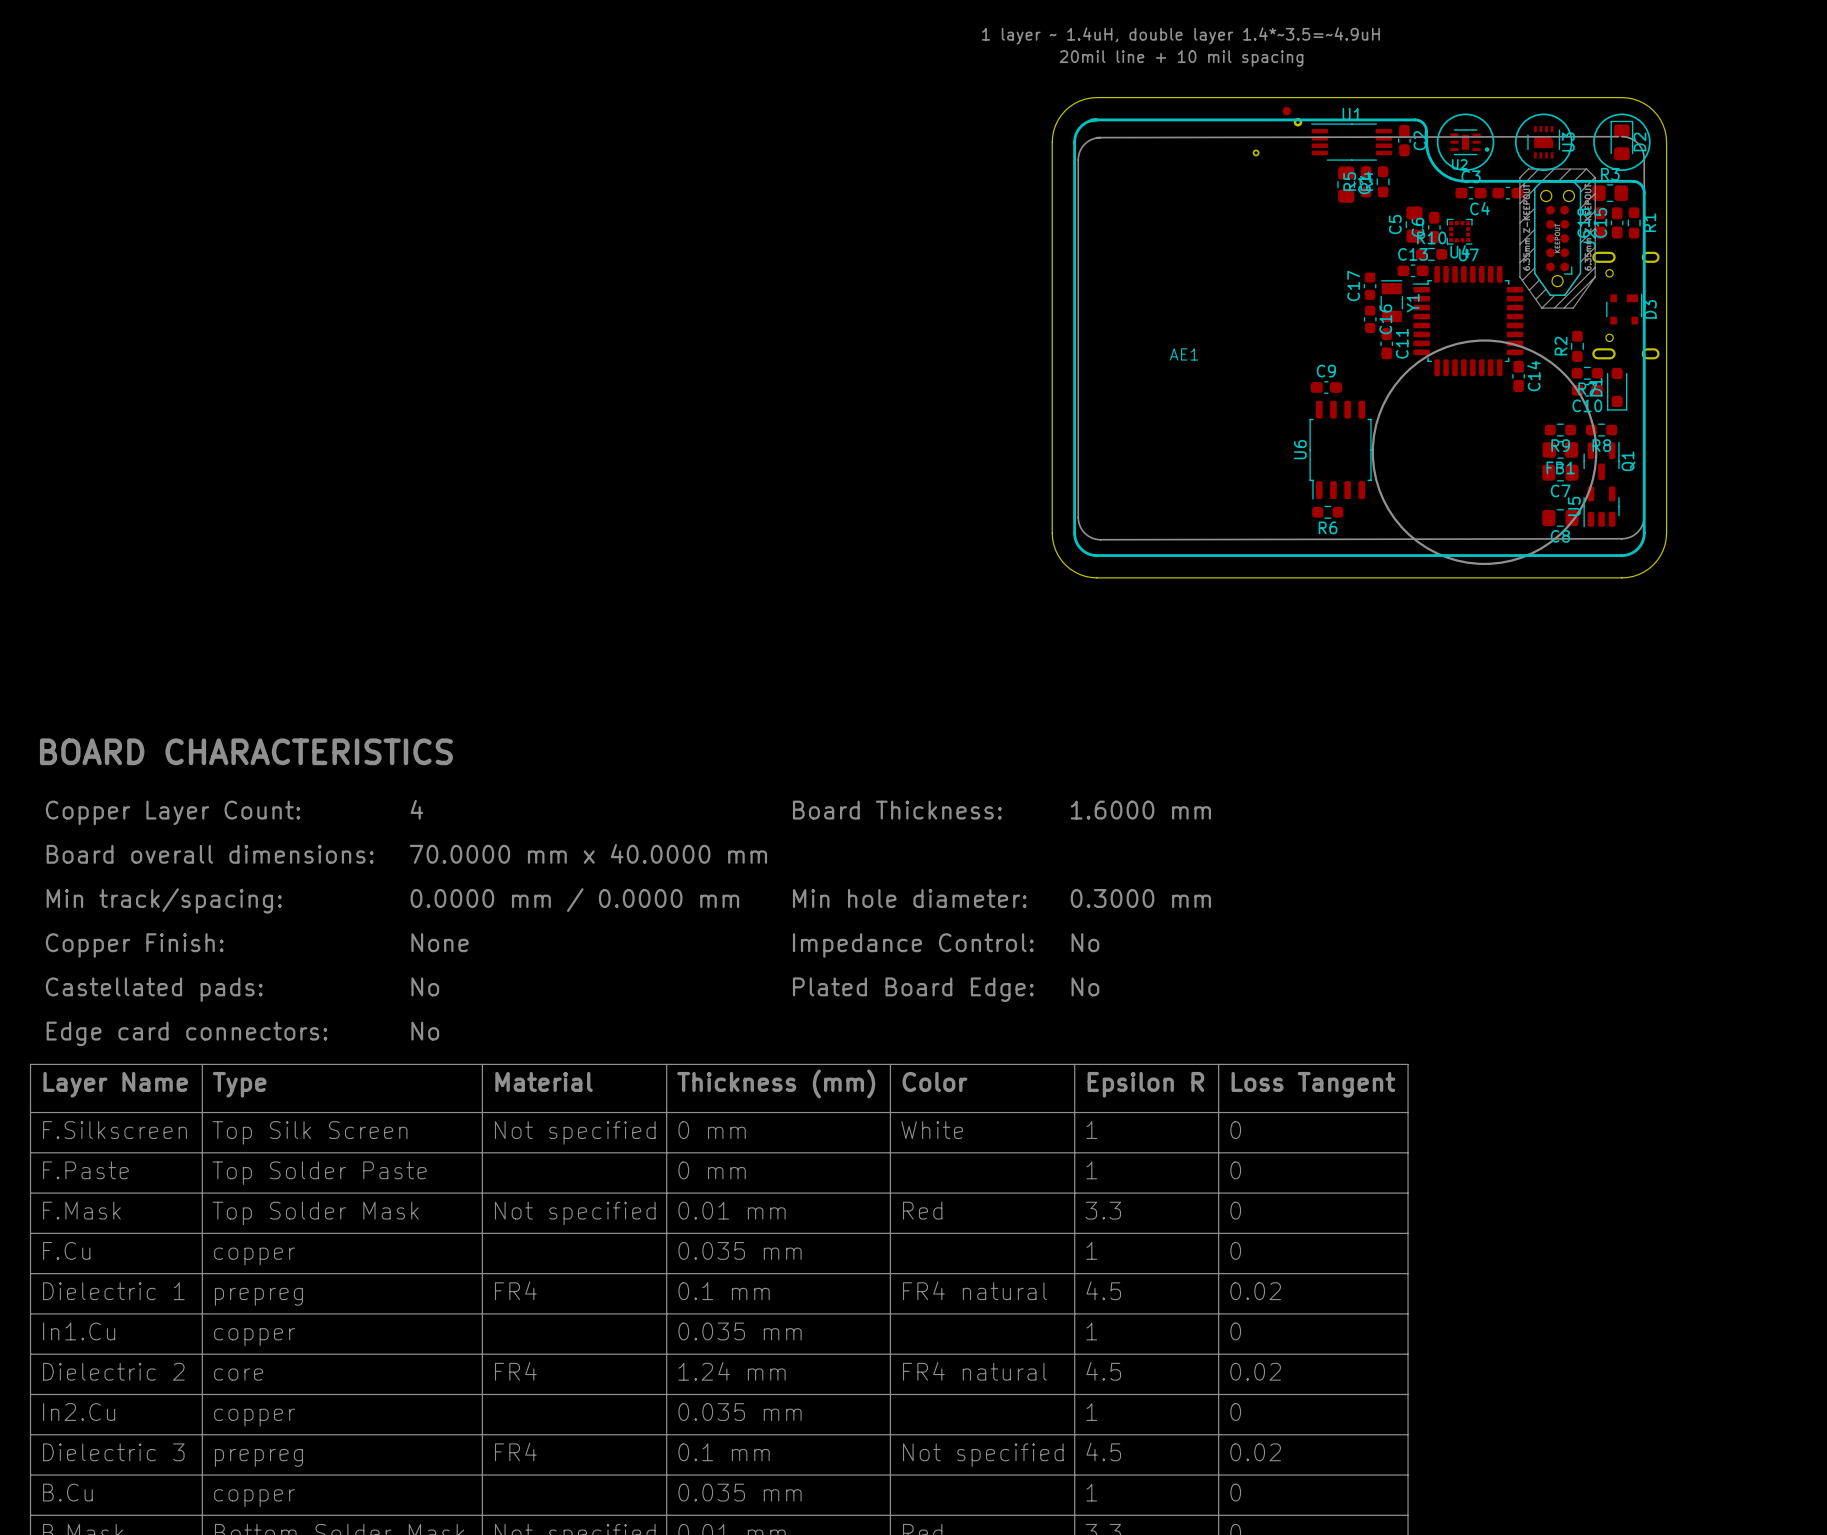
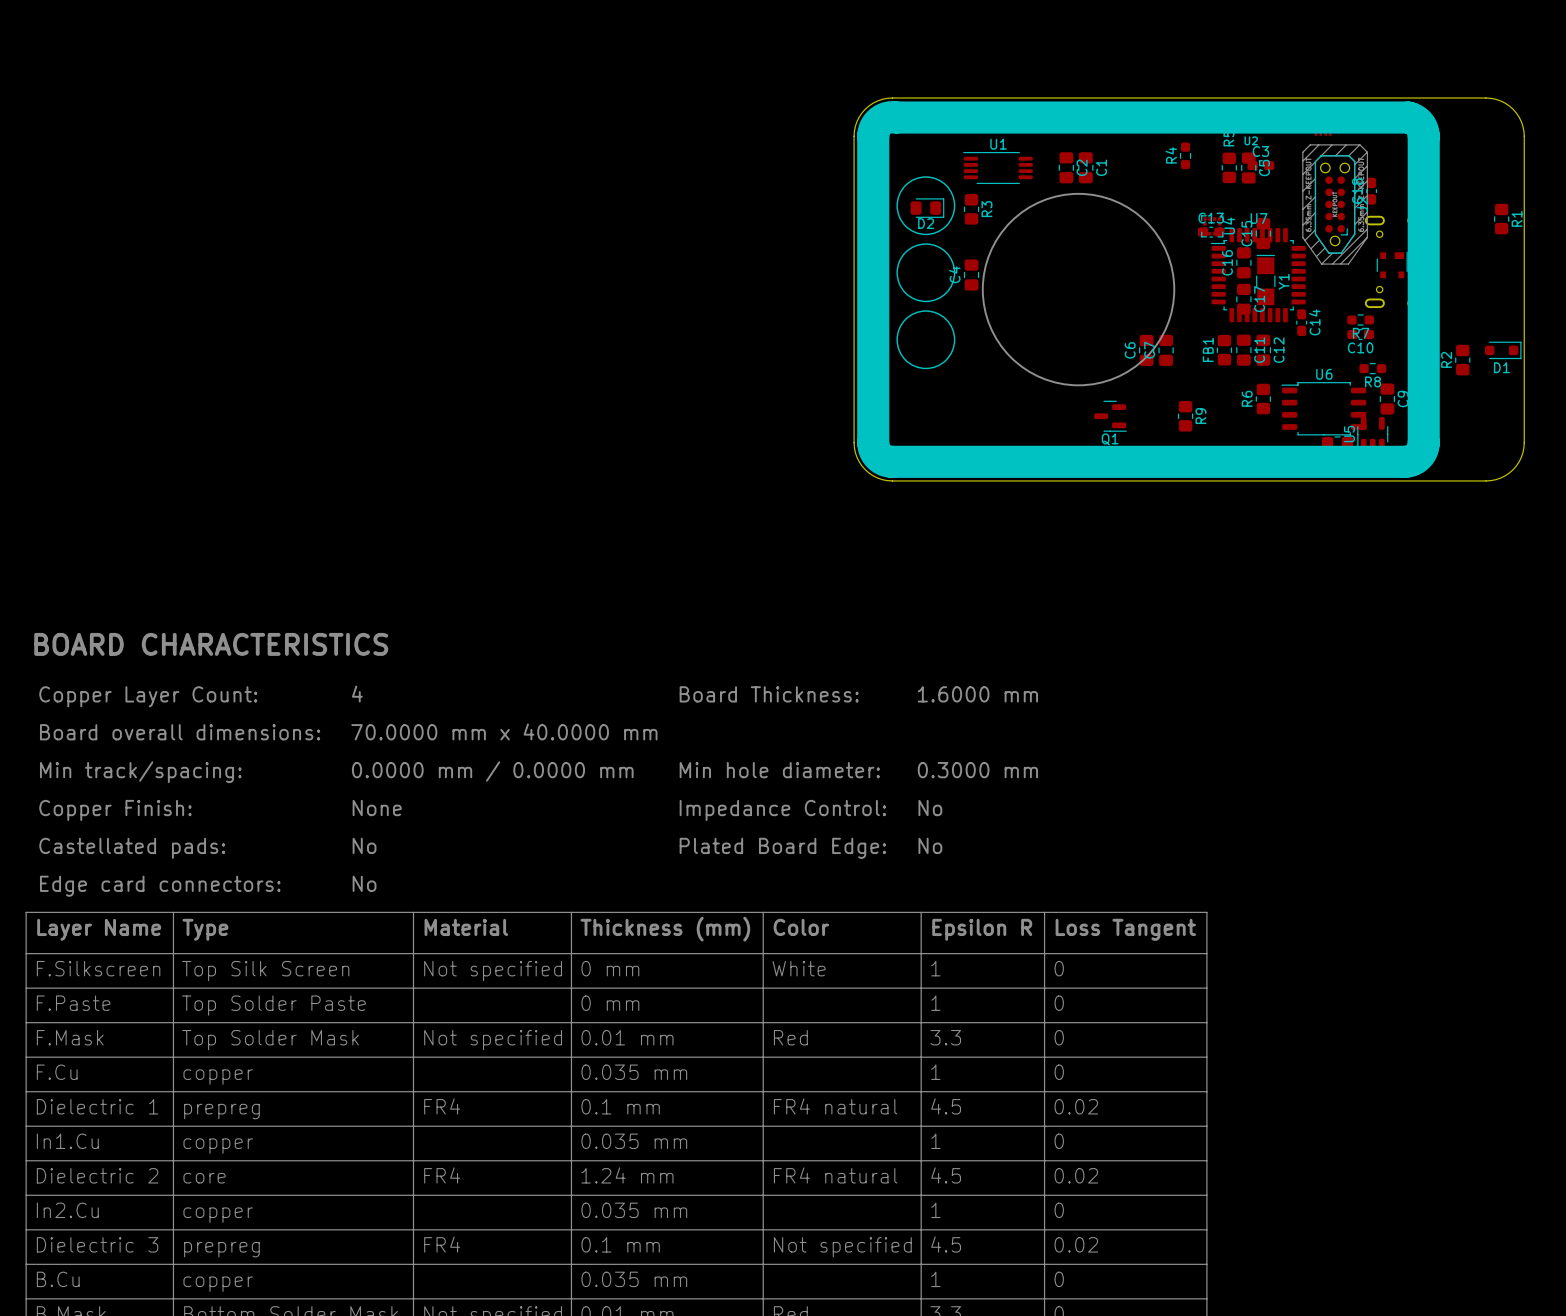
board edge: (1096, 97) (1621, 97) (1639, 100) (1649, 106) (1660, 119) (1665, 130) (1666, 142) (1666, 533) (1665, 544) (1657, 560) (1649, 568) (1639, 574) (1621, 577) (1096, 577) (1079, 574) (1069, 568) (1061, 560) (1055, 550) (1052, 533) (1052, 142) (1055, 125) (1065, 110) (1079, 100) (1096, 97) -> (892, 98) (877, 100) (865, 109) (856, 121) (854, 136) (854, 442) (859, 461) (873, 475) (892, 480) (1485, 480) (1505, 475) (1519, 461) (1524, 442) (1524, 136) (1519, 117) (1505, 103) (1485, 98) (892, 98)
drawing: [1436, 113, 1495, 172] -> none
drawing: [1514, 113, 1573, 172] -> none
drawing: [1593, 113, 1651, 172] -> none
line: (1091, 119) (1415, 119) (1416, 119) (1422, 122) (1425, 127) (1426, 147) (1431, 161) (1441, 173) (1455, 179) (1633, 181) (1640, 183) (1644, 192) (1644, 533) (1639, 547) (1631, 553) (1621, 555) (1096, 555) (1083, 550) (1076, 542) (1074, 533) (1074, 142) (1076, 132) (1081, 126) (1089, 121) (1094, 120) (1096, 119) -> none
C2 footprint: [1398, 125, 1411, 157] -> [1058, 152, 1074, 184]
AE1: (1277, 131) -> none
line: (1618, 136) (1096, 137) -> none
line: (1621, 136) (1629, 137) (1637, 143) (1642, 149) (1644, 159) (1644, 516) (1642, 526) (1635, 533) (1621, 538) (1100, 539) (1090, 537) (1084, 533) (1079, 524) (1078, 517) (1078, 157) (1080, 150) (1086, 142) (1100, 137) -> none
line: none -> (896, 117) (1408, 117) (1414, 119) (1420, 125) (1423, 136) (1423, 442) (1420, 452) (1412, 459) (1404, 461) (892, 461) (882, 458) (875, 450) (873, 442) (873, 136) (875, 127) (880, 121) (888, 117) (896, 117)
D2 rotation: 0° (1621, 140) -> 90° clockwise (927, 208)
D2 position: (1621, 140) -> (927, 208)
U1 position: (1351, 142) -> (997, 167)
R5 footprint: [1359, 166, 1373, 198] -> [1221, 152, 1237, 184]
R5 name position: R5 (1349, 181) -> R5 (1228, 138)
C1 position: (1346, 184) -> (1085, 167)
C4 footprint: [1492, 186, 1524, 200] -> [963, 259, 980, 291]
R3 rotation: 0° (1610, 193) -> 90° clockwise (971, 209)
R3 position: (1610, 193) -> (971, 209)
drawing: none -> [896, 176, 956, 370]
C15 footprint: [1610, 207, 1624, 239] -> [1255, 218, 1271, 250]
R1 footprint: [1627, 207, 1641, 239] -> [1494, 203, 1510, 235]
C6 footprint: [1427, 211, 1441, 244] -> [1139, 334, 1155, 366]
C5 name position: C5 (1395, 224) -> C5 (1264, 167)
C5 position: (1414, 224) -> (1248, 167)
U4 rotation: 0° (1459, 231) -> 90° counterclockwise (1212, 226)
U4 position: (1459, 231) -> (1212, 226)
R10: (1431, 254) -> none
C17 footprint: [1363, 272, 1377, 300] -> [1236, 283, 1252, 315]
Y1 footprint: [1380, 280, 1404, 323] -> [1256, 254, 1276, 306]
C17 name position: C17 (1353, 285) -> C17 (1259, 299)
C16 footprint: [1363, 305, 1377, 334] -> [1236, 247, 1252, 279]
C16 name position: C16 (1385, 319) -> C16 (1227, 262)
C11 footprint: [1380, 328, 1394, 360] -> [1236, 334, 1252, 366]
R2 footprint: [1570, 330, 1584, 362] -> [1455, 344, 1471, 376]
C9 name position: C9 (1326, 371) -> C9 (1403, 399)
C9 footprint: [1310, 381, 1342, 394] -> [1379, 383, 1395, 415]
D1 rotation: 0° (1617, 389) -> 90° counterclockwise (1503, 350)
D1 position: (1617, 389) -> (1503, 350)
C12: none -> (1263, 350)
R9 footprint: [1544, 423, 1577, 437] -> [1177, 400, 1194, 432]
R9 name position: R9 (1560, 445) -> R9 (1200, 416)
FB1 rotation: 0° (1560, 449) -> 90° clockwise (1224, 350)
FB1 position: (1560, 449) -> (1224, 350)
U6 rotation: 0° (1340, 450) -> 90° clockwise (1323, 408)
U6 position: (1340, 450) -> (1323, 408)
part position: (1484, 452) -> (1078, 289)
Q1 rotation: 0° (1601, 460) -> 90° clockwise (1110, 416)
Q1 position: (1601, 460) -> (1110, 416)
C7 rotation: 0° (1560, 472) -> 90° clockwise (1166, 350)
C7 position: (1560, 472) -> (1166, 350)
R6 footprint: [1312, 505, 1344, 519] -> [1255, 383, 1271, 415]
R6 name position: R6 (1328, 527) -> R6 (1247, 398)

